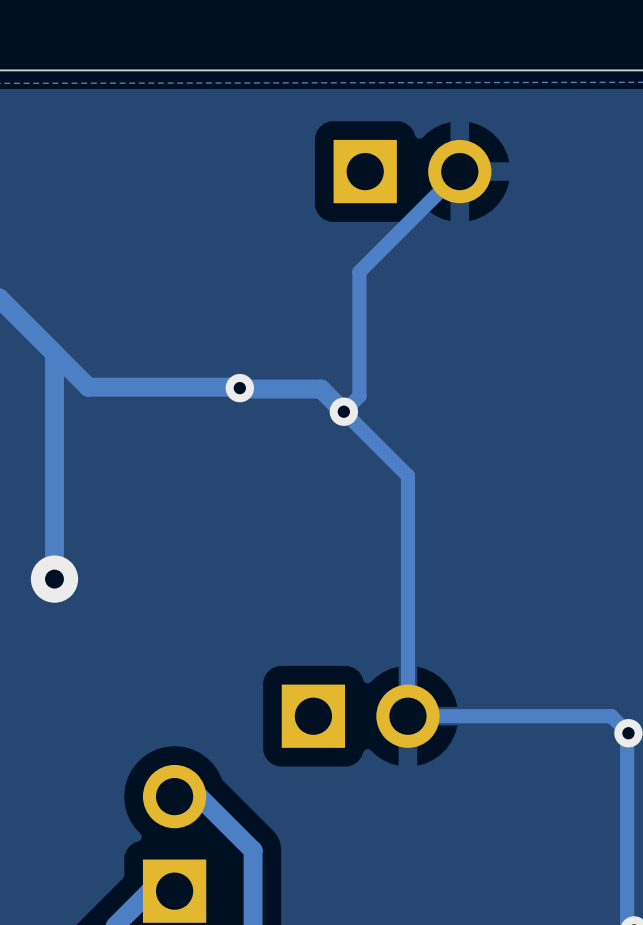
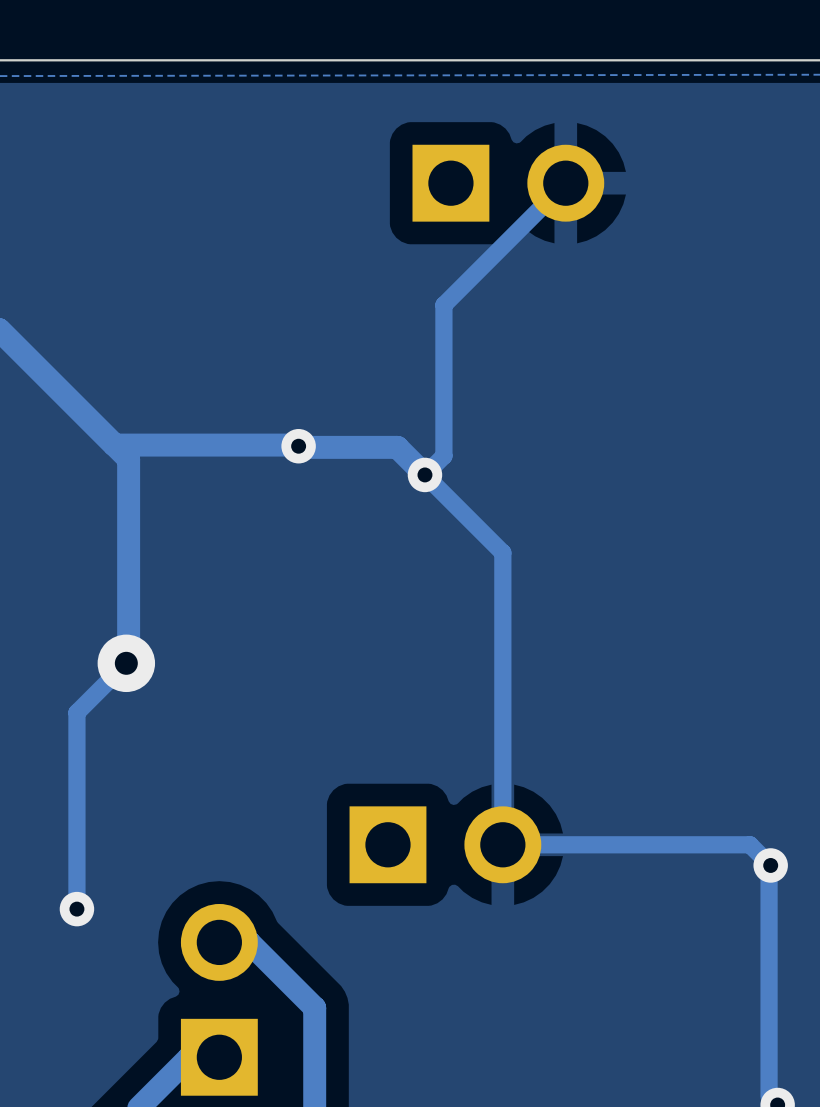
track: (54, 353) (54, 579) -> none
track: none -> (114, 445) (128, 459) (128, 661) (76, 712) (76, 909)
via position: (54, 579) -> (126, 663)
via: none -> (76, 909)

